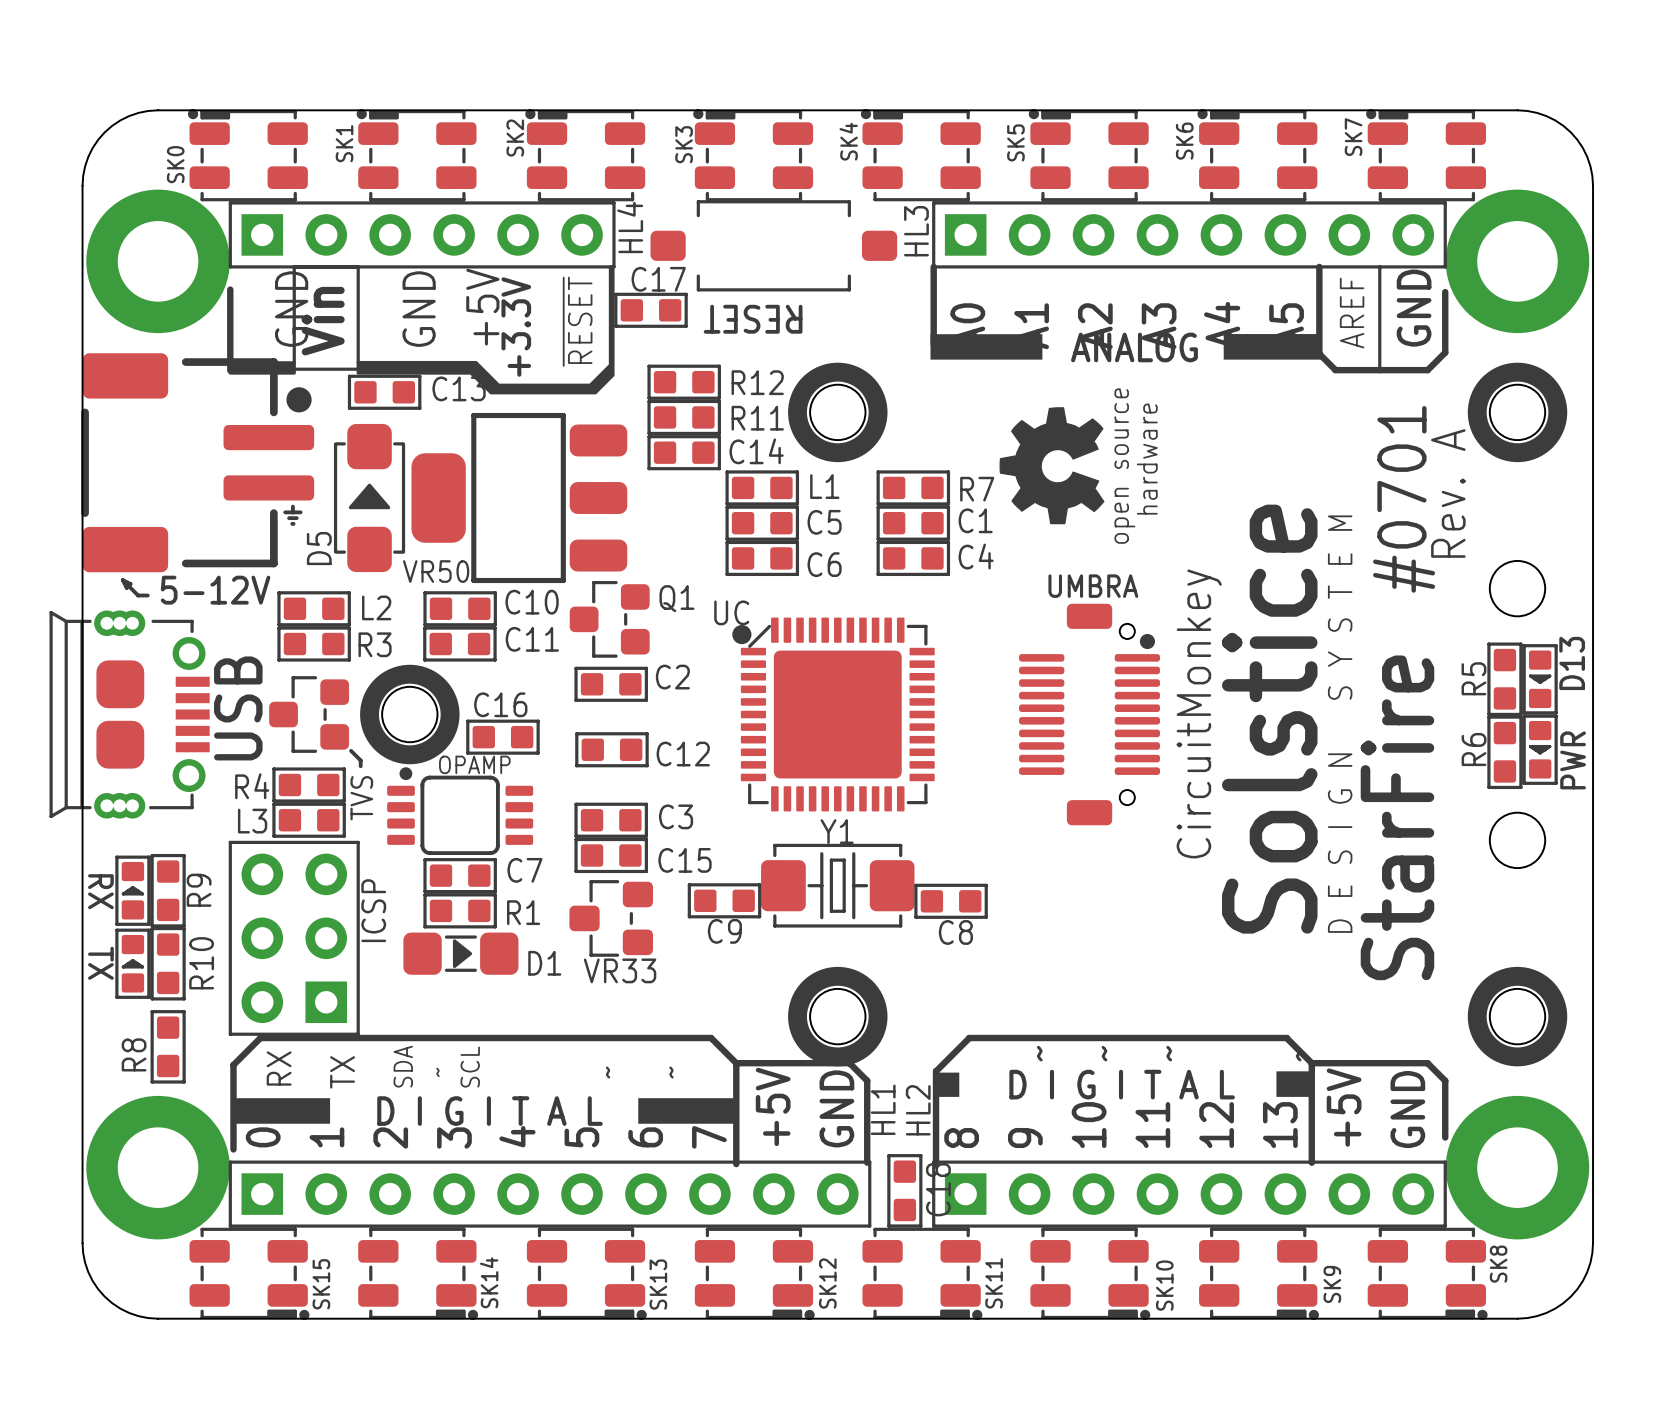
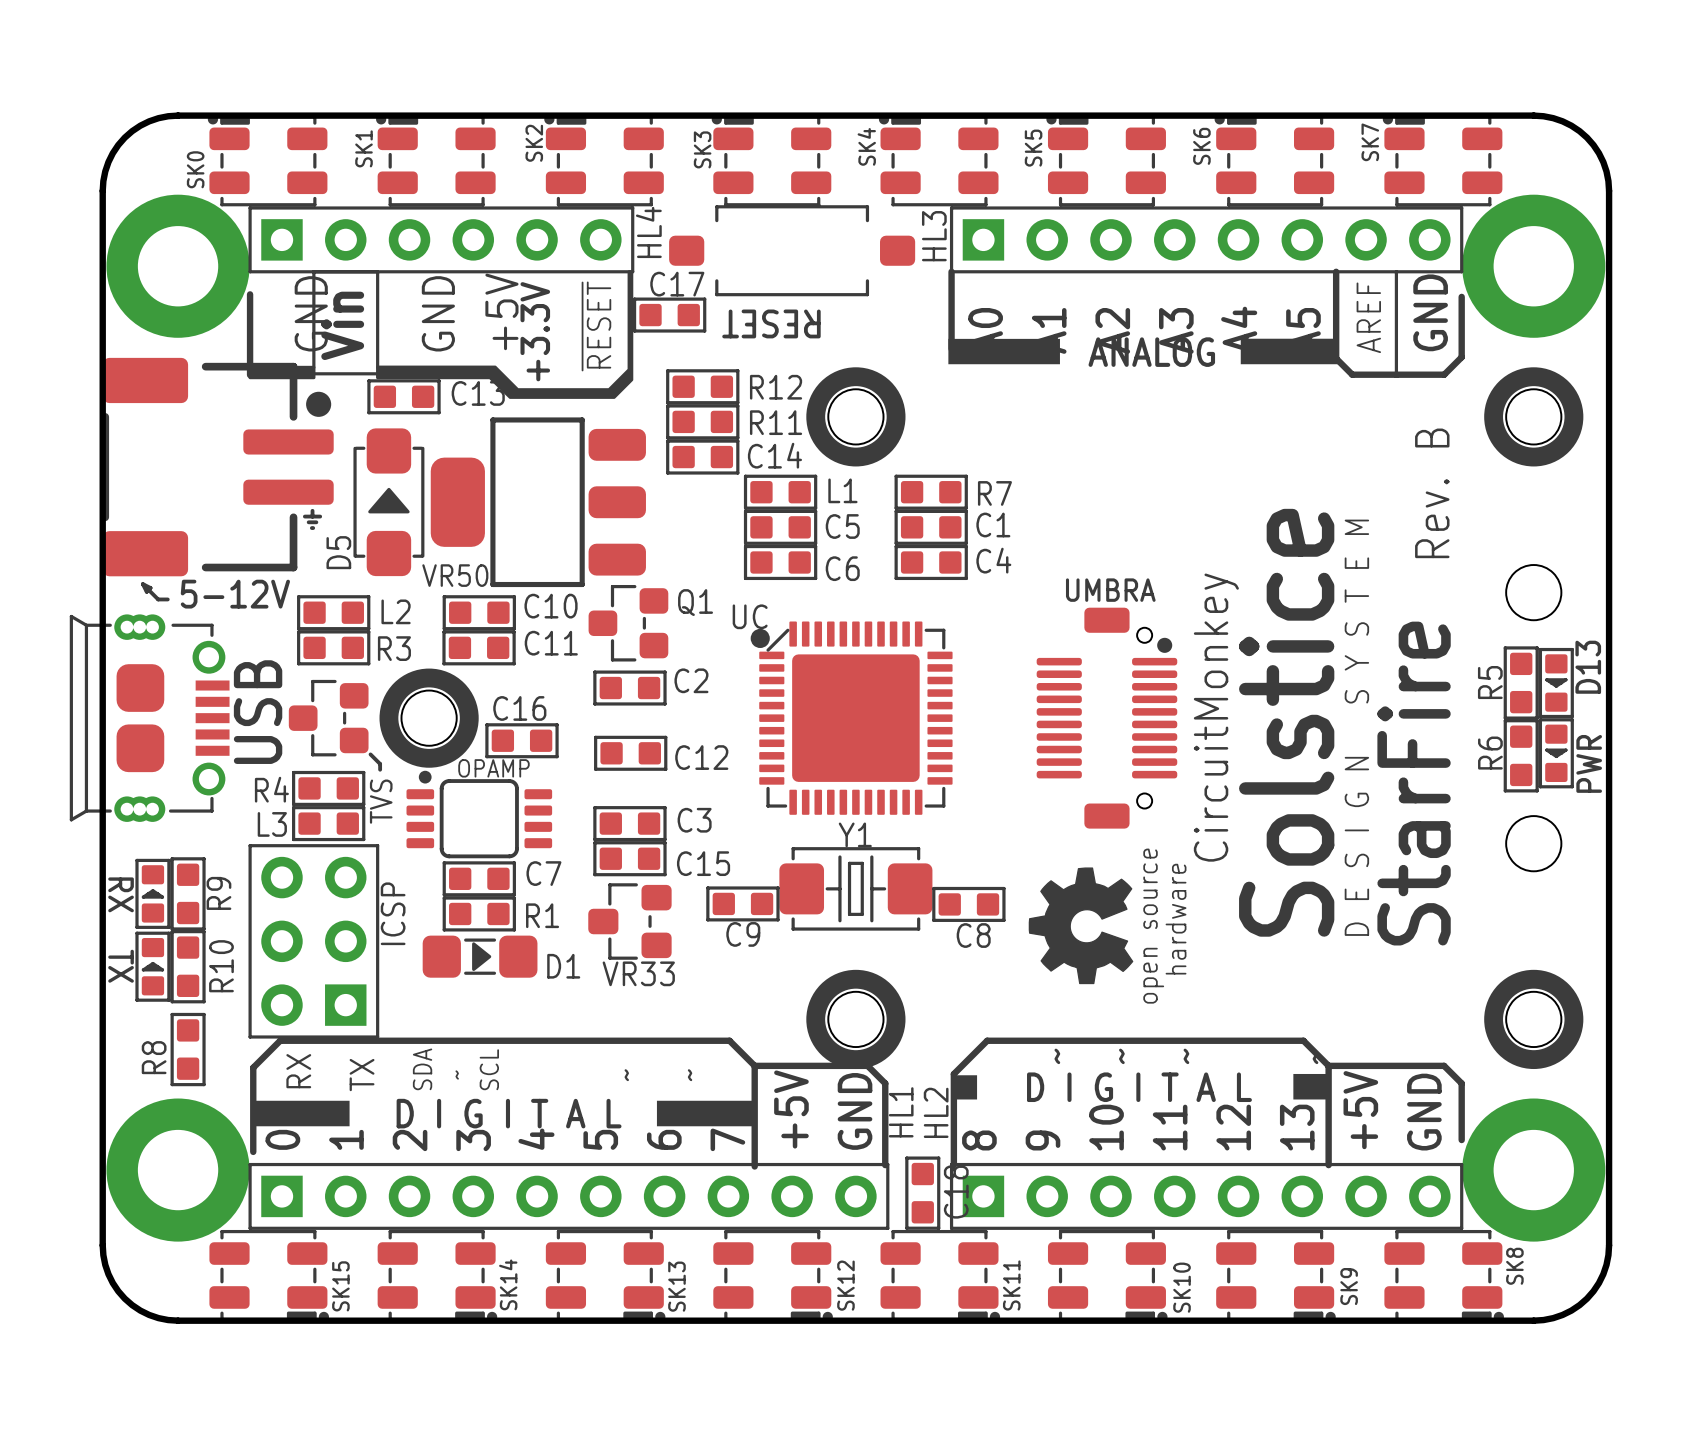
board edge: none -> (178, 115) (1533, 115) (1553, 118) (1579, 131) (1598, 153) (1606, 171) (1609, 190) (1609, 1245) (1606, 1264) (1593, 1291) (1571, 1310) (1553, 1318) (1533, 1320) (178, 1320) (158, 1318) (132, 1305) (112, 1283) (105, 1264) (102, 1245) (102, 190) (108, 162) (124, 137) (149, 121) (178, 115)
drawing position: (1051, 465) -> (1081, 925)
text: Rev. A (1448, 493) -> none
text: #0701 (1404, 499) -> Rev. B (1432, 493)
text position: StarFire (1397, 817) -> StarFire (1414, 783)

